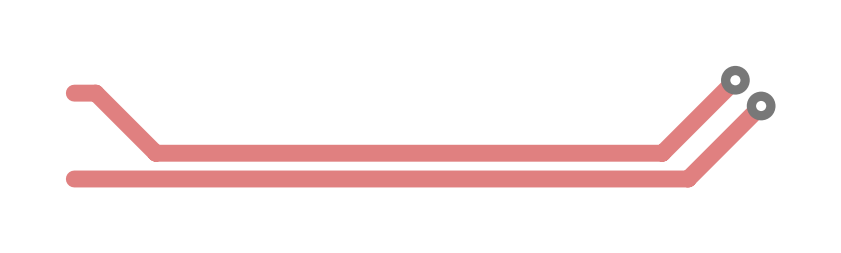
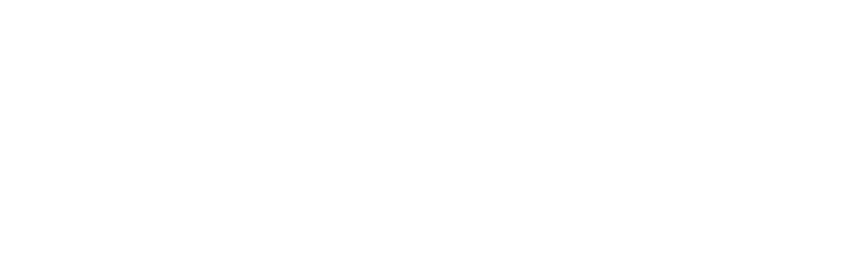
track: (735, 80) (662, 153) (155, 153) (95, 93) (74, 93) -> none
via: (735, 80) -> none
track: (761, 106) (688, 178) (74, 178) -> none
via: (761, 106) -> none

